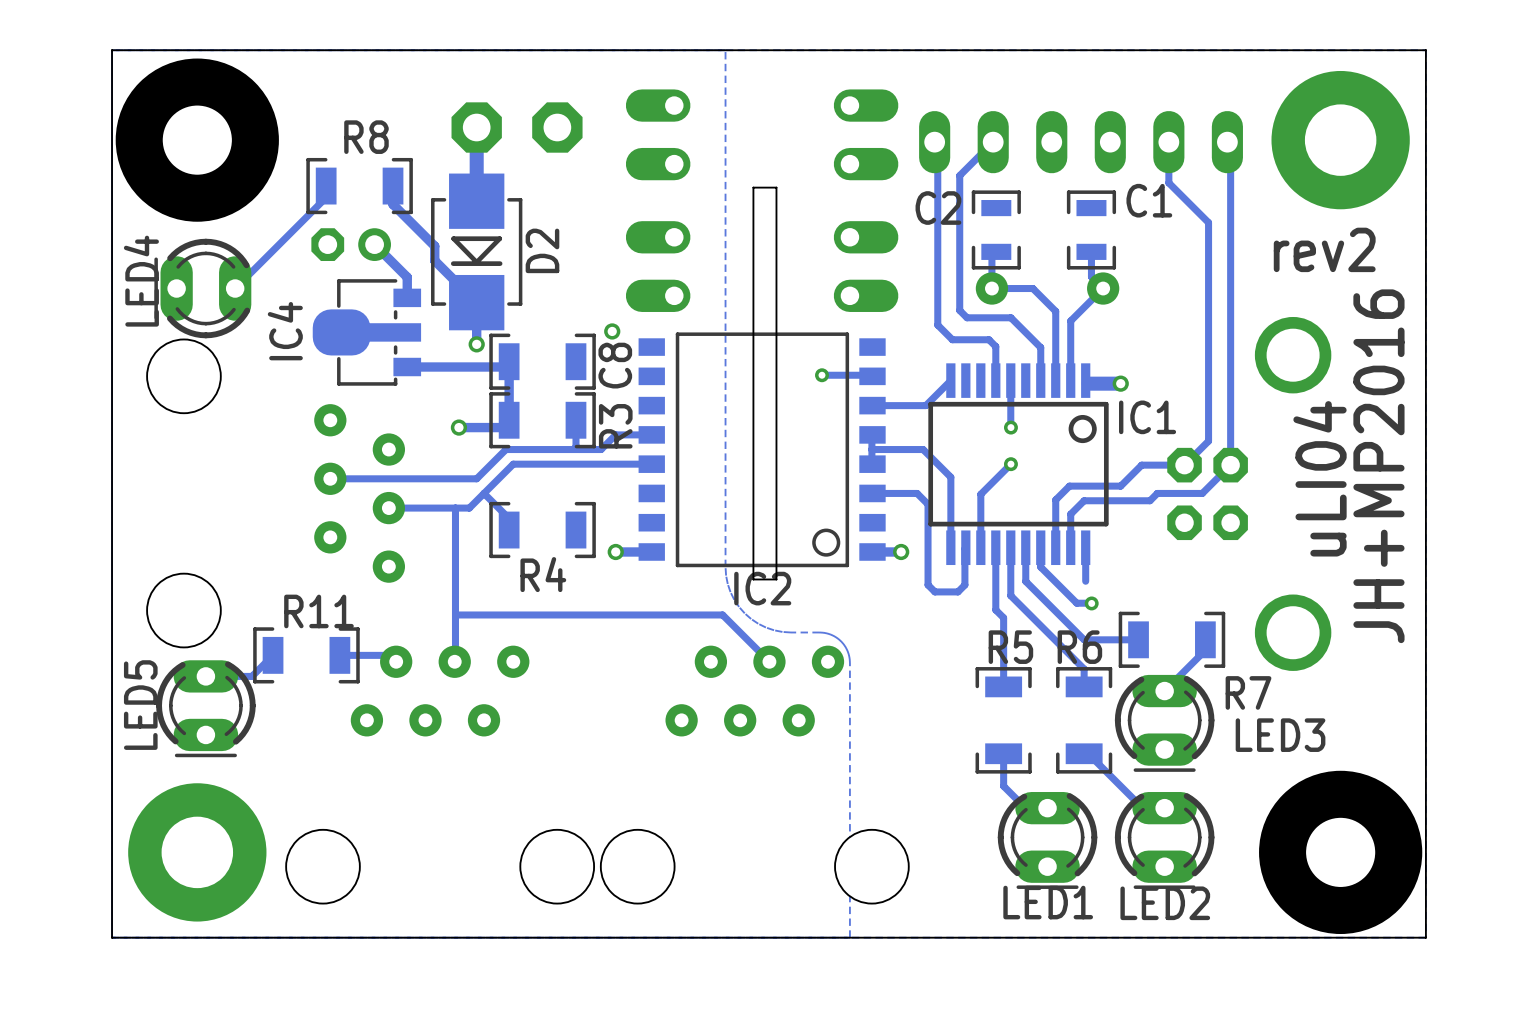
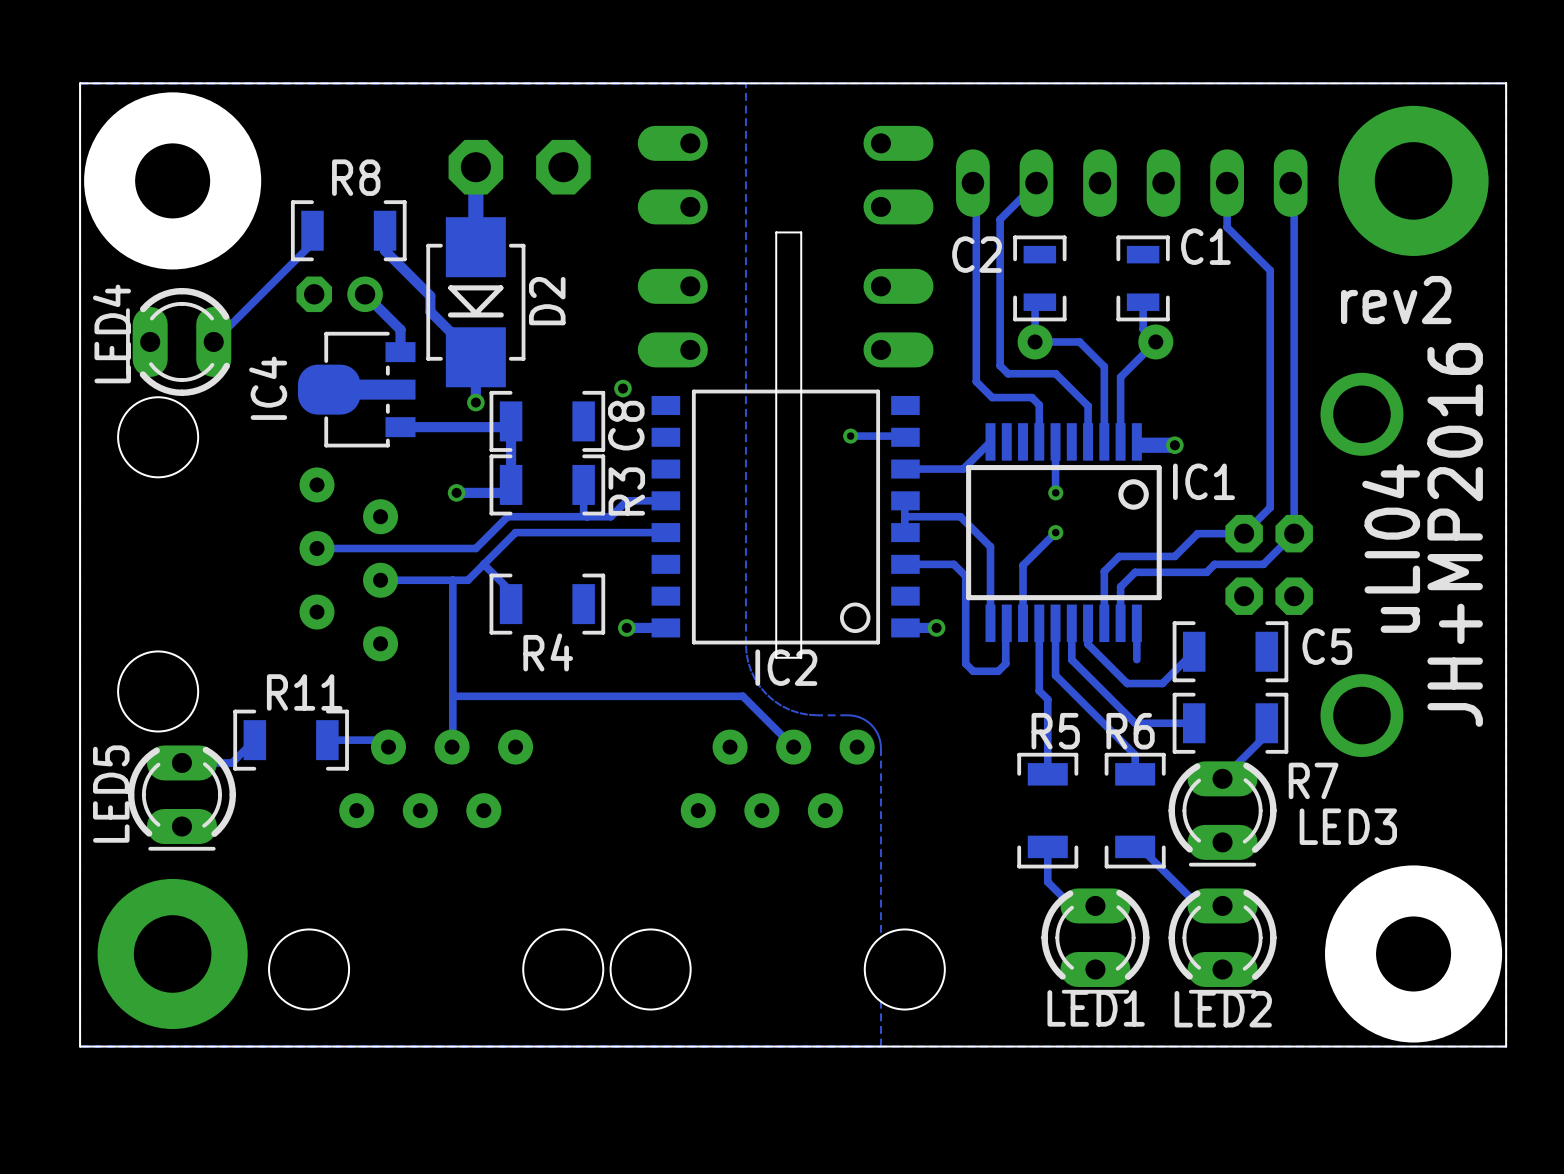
track: none -> (1194, 651) (1162, 683) (1143, 683)
C5: none -> (1230, 651)
via: (1091, 603) -> none

